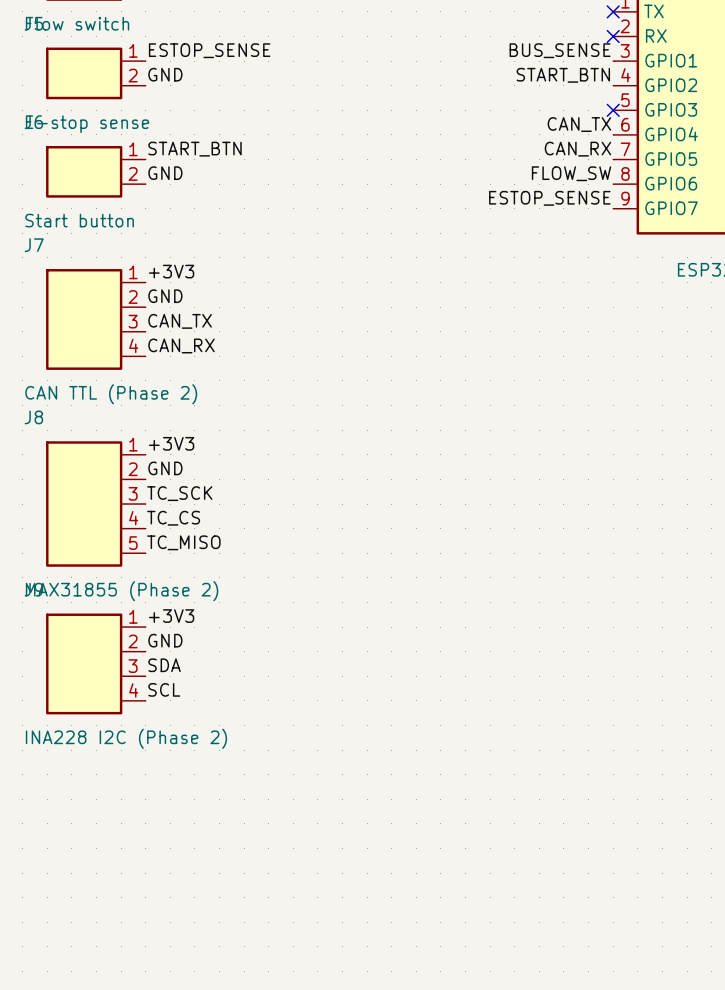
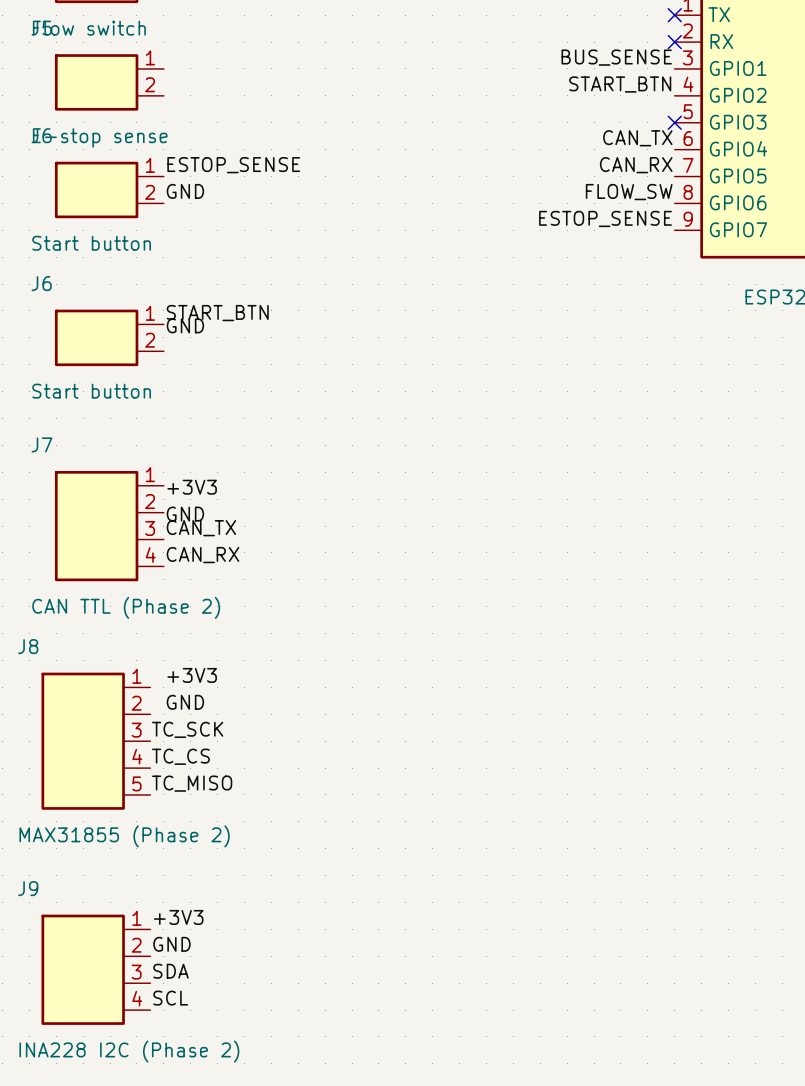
label: ESTOP_SENSE (209, 50) -> none
label: GND (165, 74) -> none
label: START_BTN (195, 149) -> ESTOP_SENSE (233, 165)
label: +3V3 (171, 271) -> none
label: none -> START_BTN (217, 313)
J6: none -> Start button (109, 337)
J7 position: (95, 319) -> (109, 526)
label position: CAN_TX (180, 321) -> CAN_TX (201, 528)
label position: CAN_RX (181, 345) -> CAN_RX (203, 555)
label position: TC_SCK (179, 493) -> TC_SCK (187, 729)
J8 position: (95, 504) -> (95, 741)
label position: TC_CS (173, 518) -> TC_CS (180, 756)
label position: TC_MISO (183, 542) -> TC_MISO (192, 783)
J9 position: (95, 663) -> (95, 969)
label position: SDA (164, 665) -> SDA (170, 971)
label position: SCL (164, 689) -> SCL (170, 998)
label: none -> +3V3 (178, 917)
label: none -> GND (171, 944)

